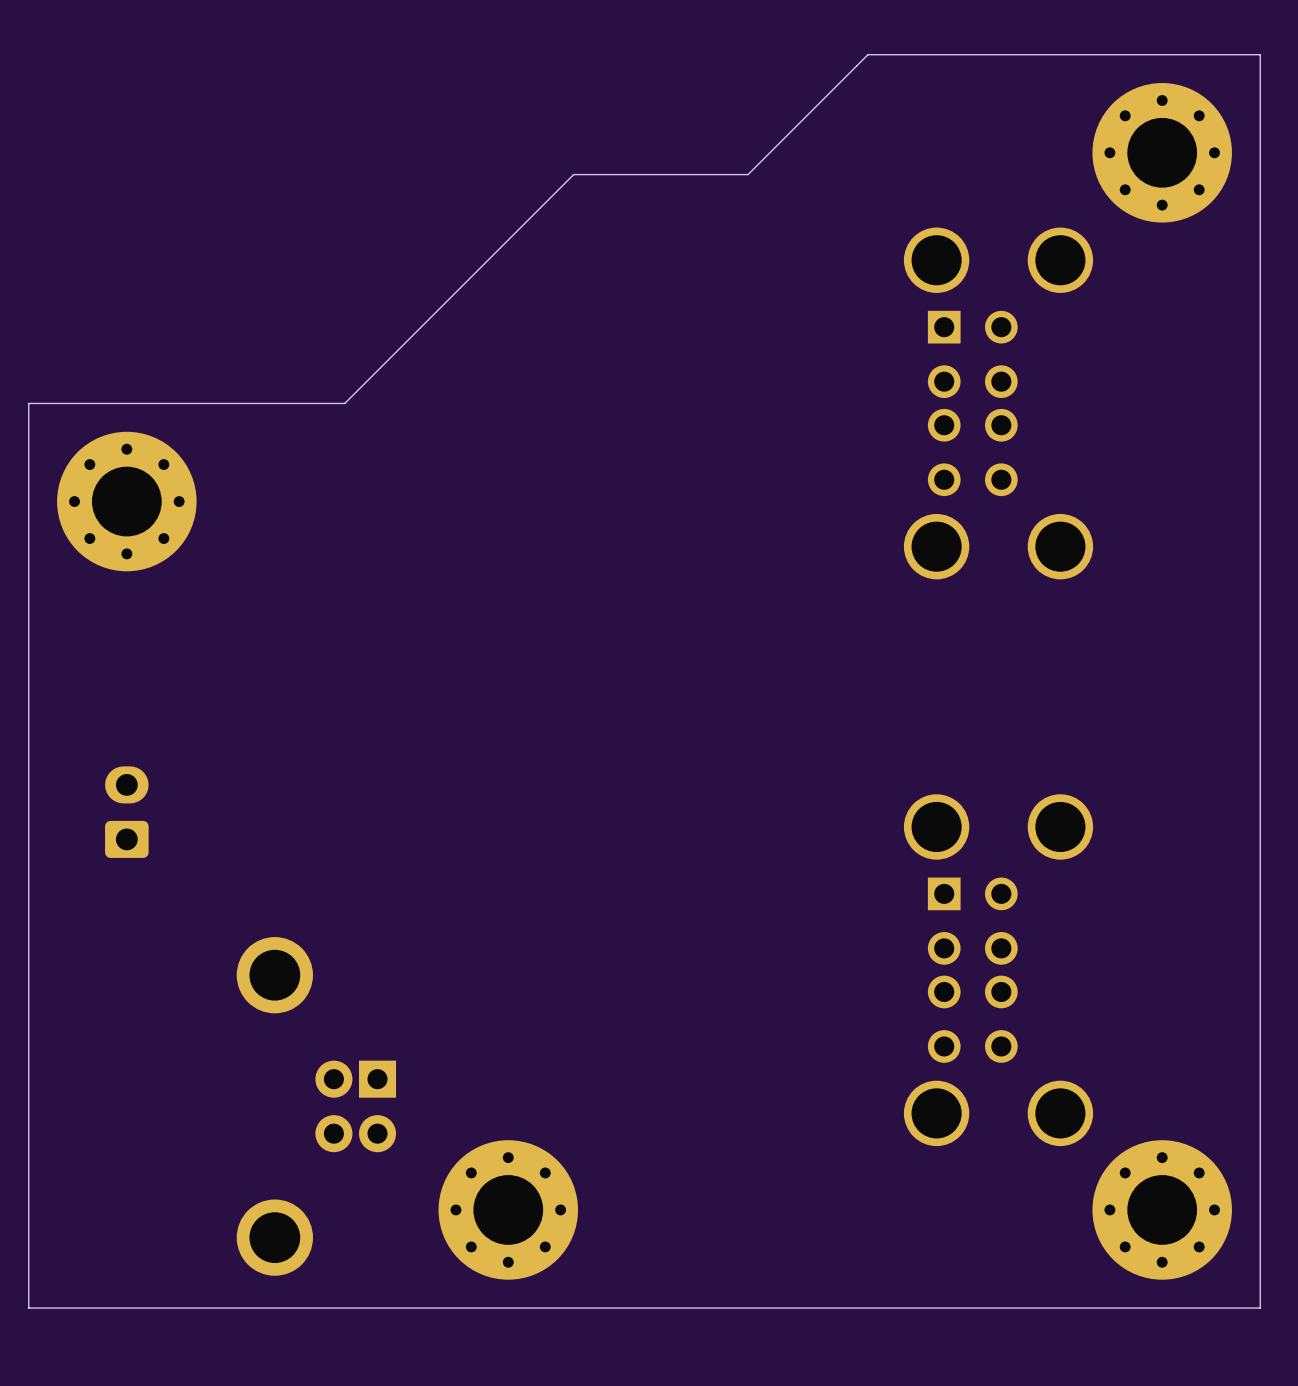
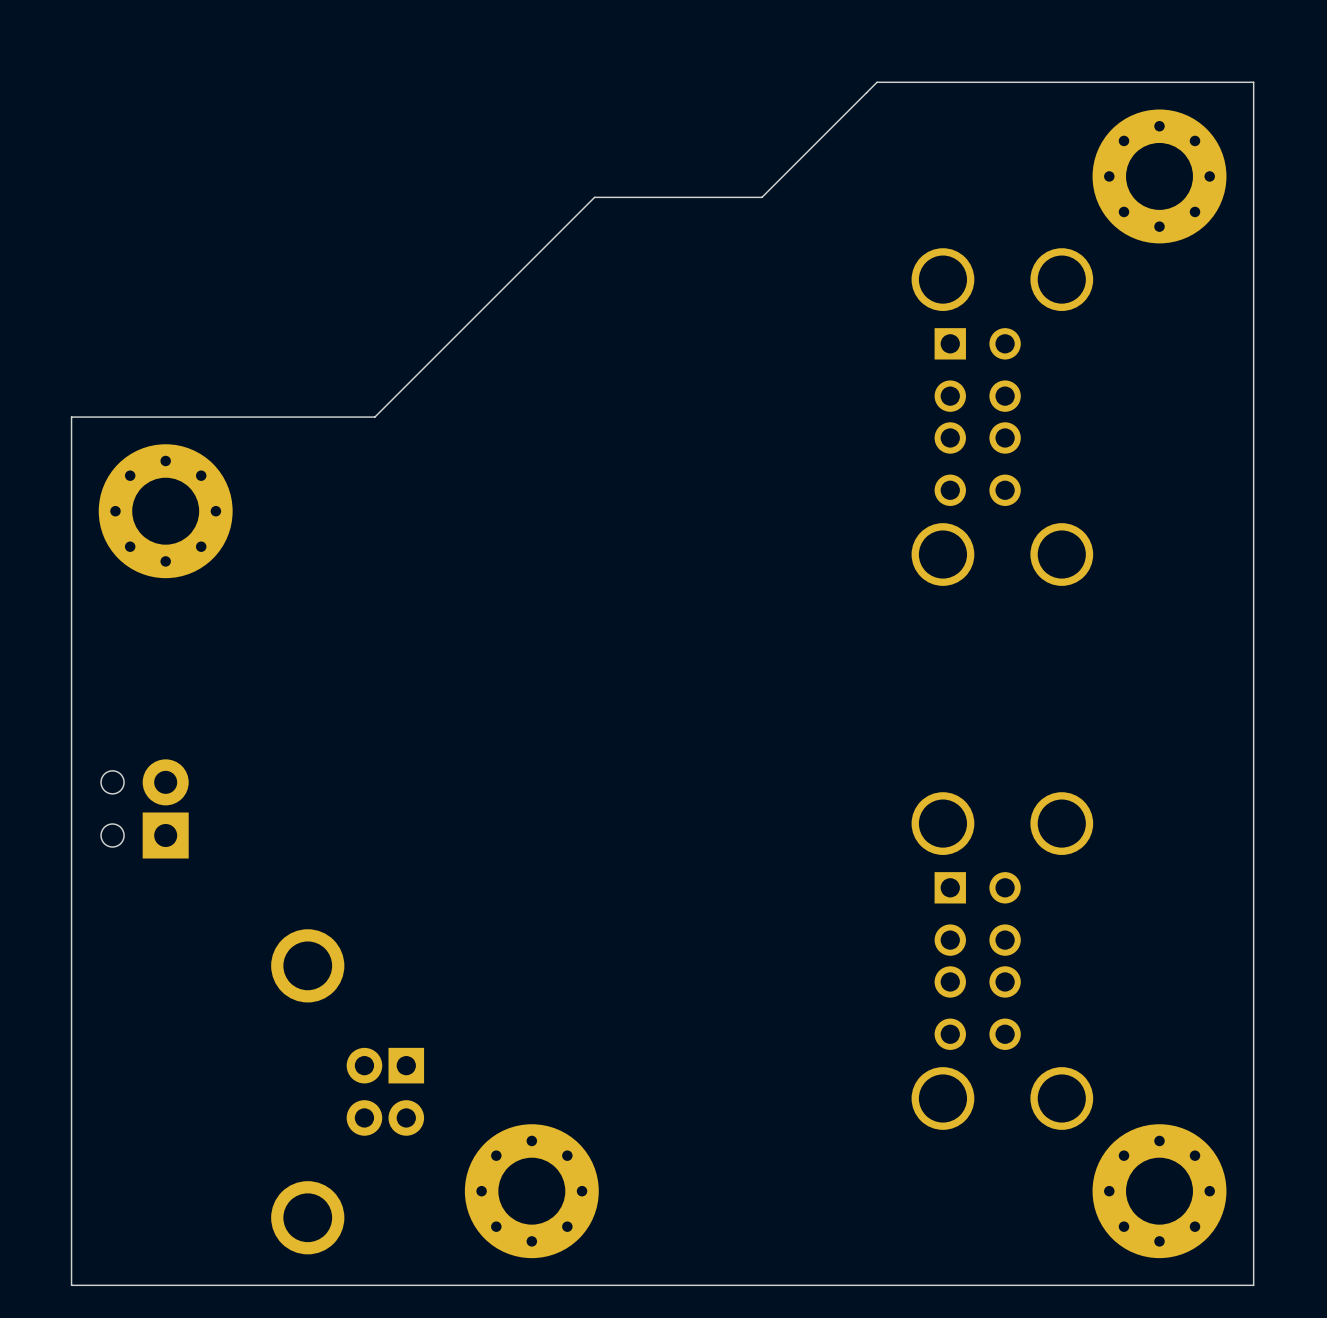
part footprint: [105, 766, 149, 858] -> [101, 759, 189, 859]

